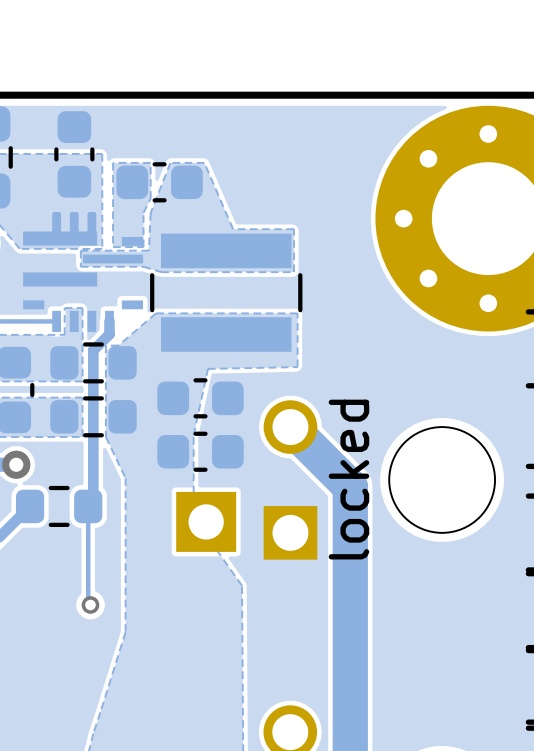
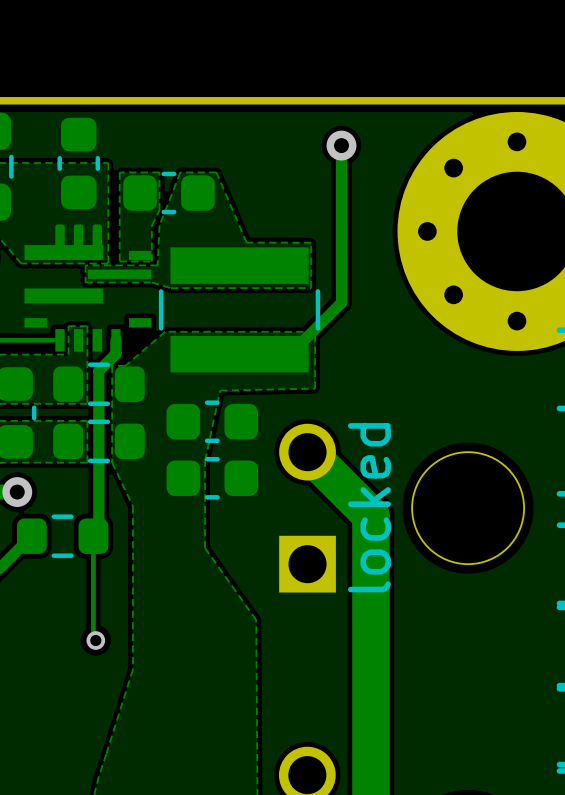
track: none -> (341, 145) (341, 302) (290, 354) (239, 354)
via: none -> (341, 145)
part: (206, 521) -> none

